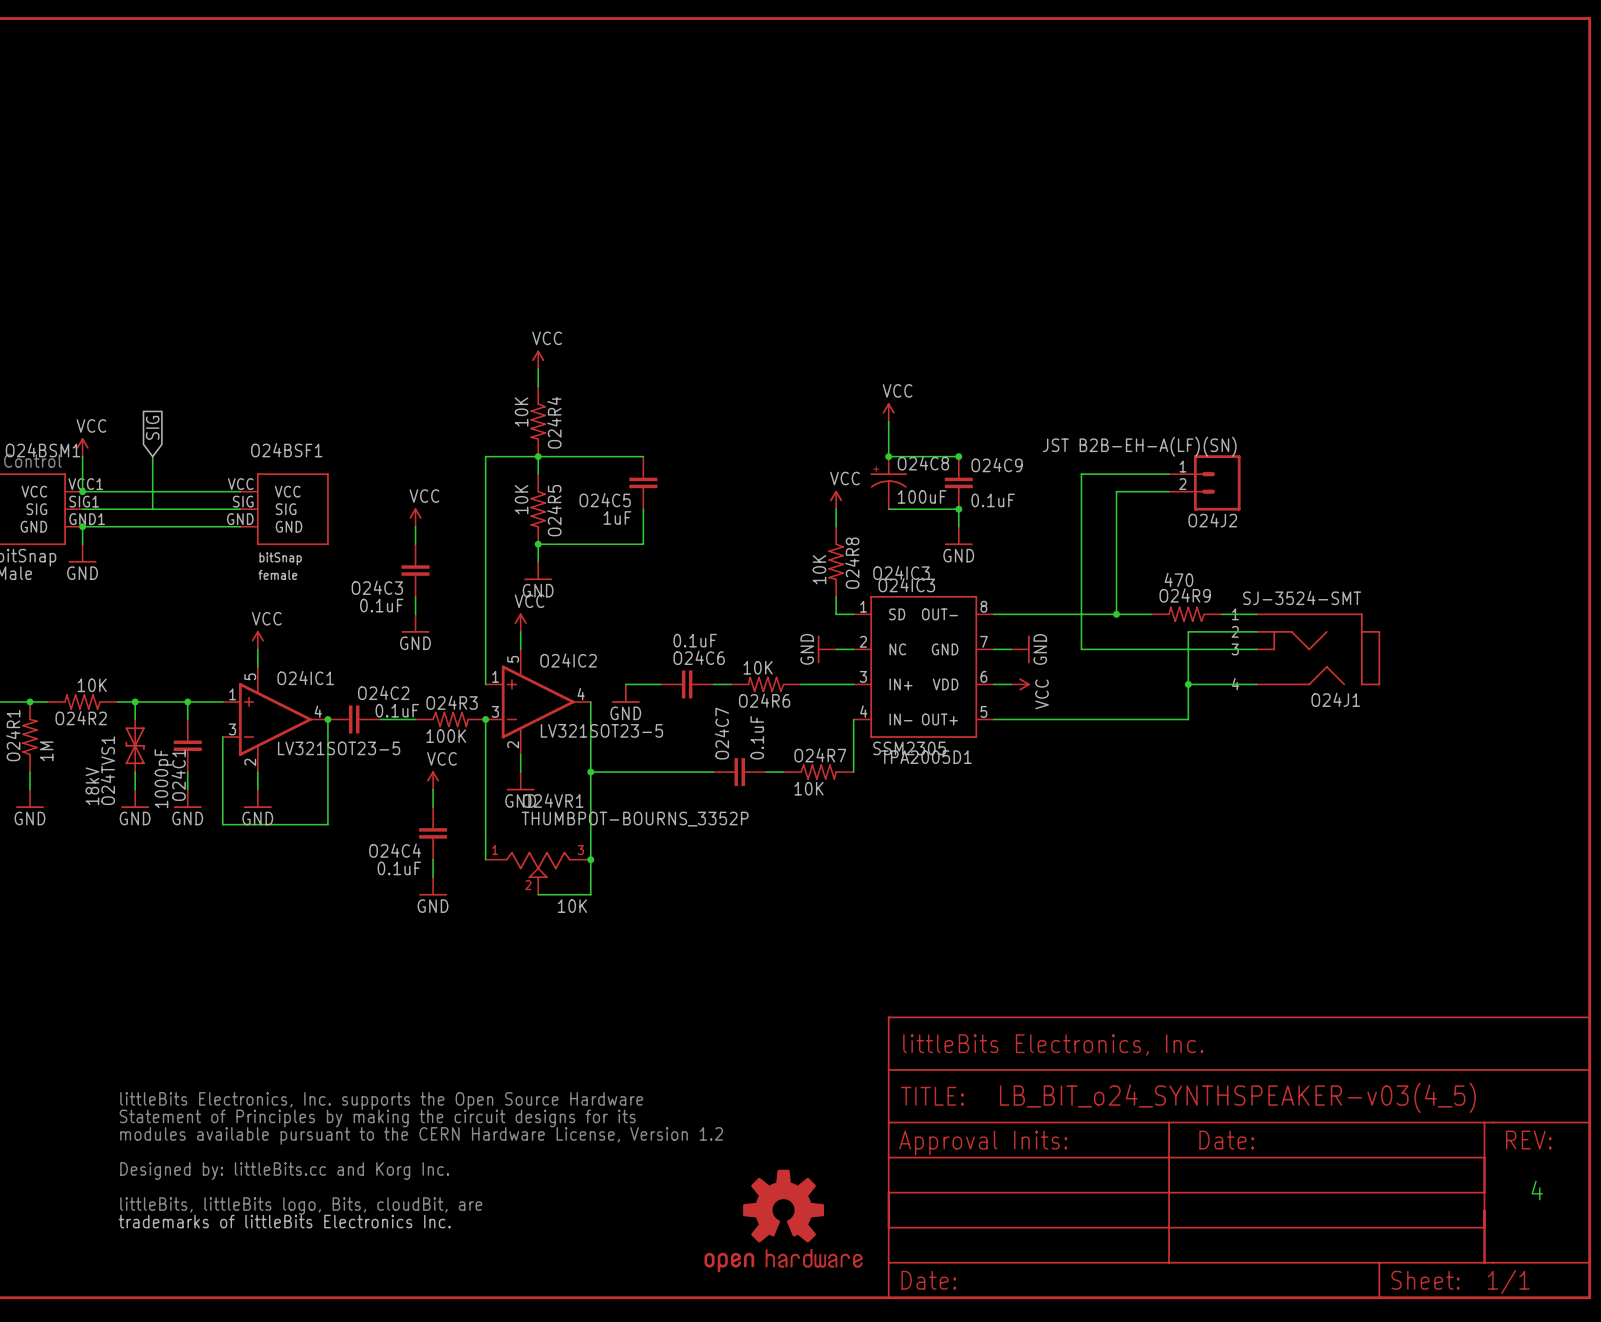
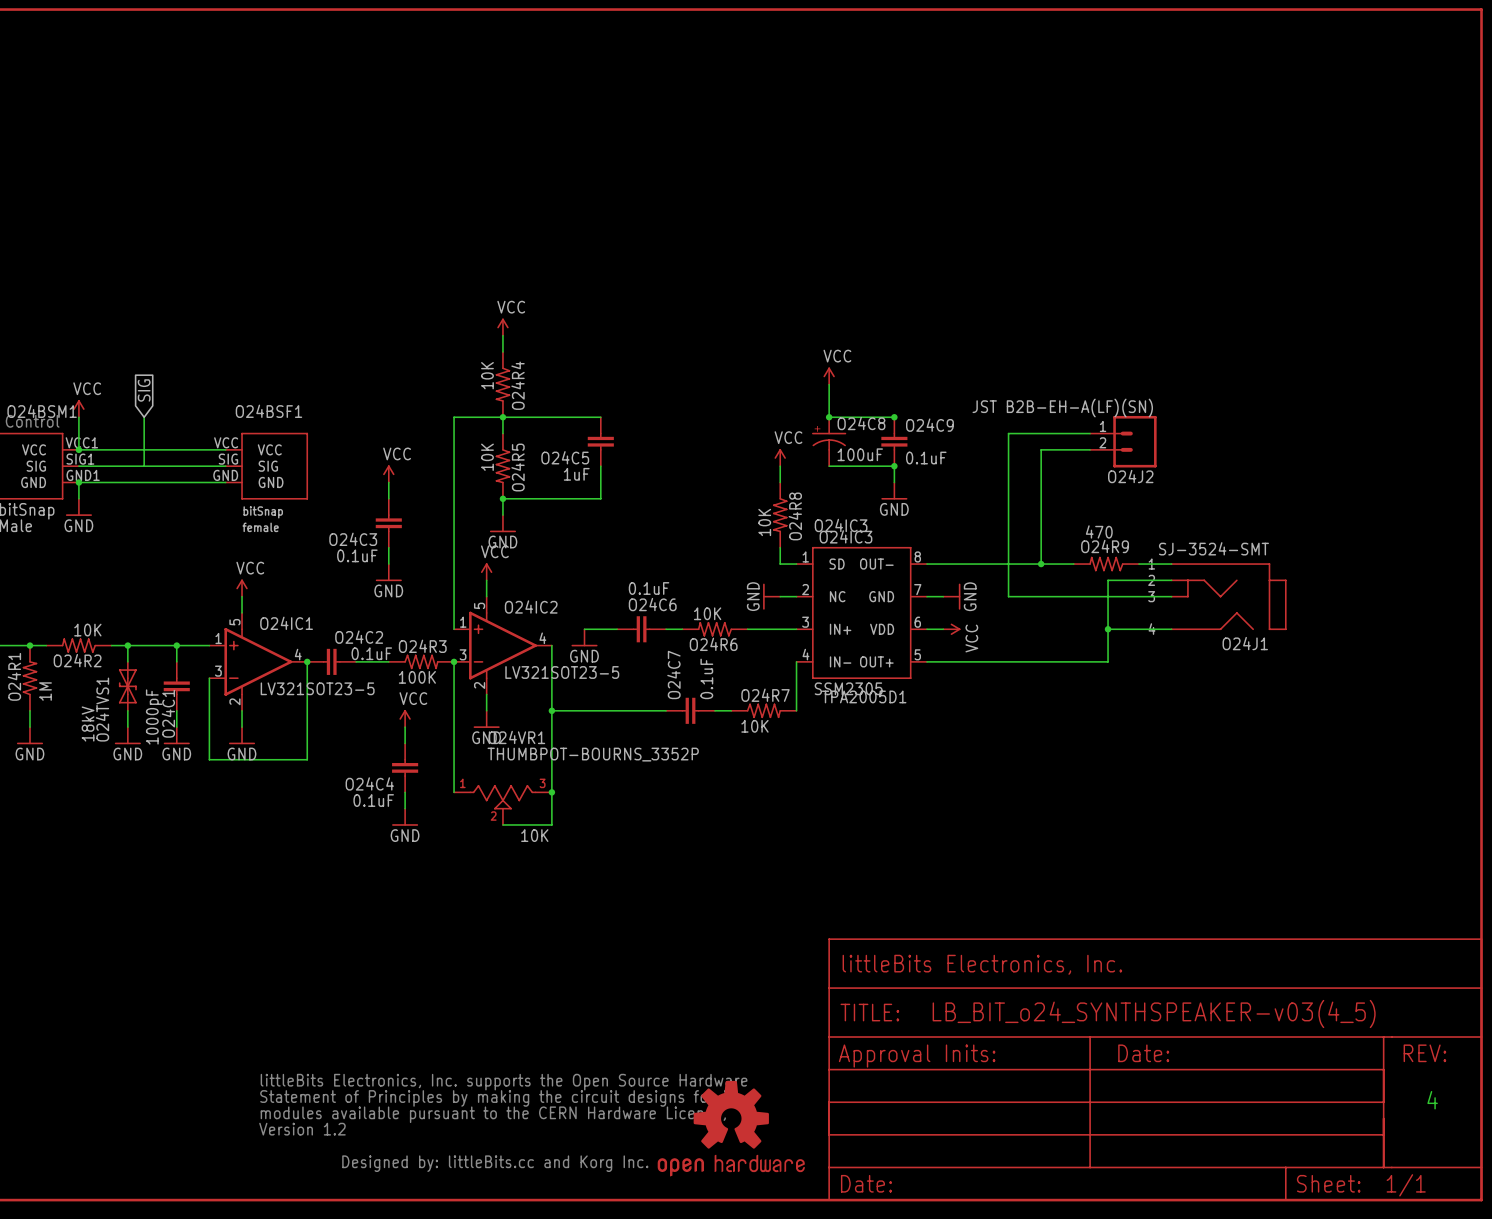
part: (420, 1160) -> none
part: none -> (503, 1122)

